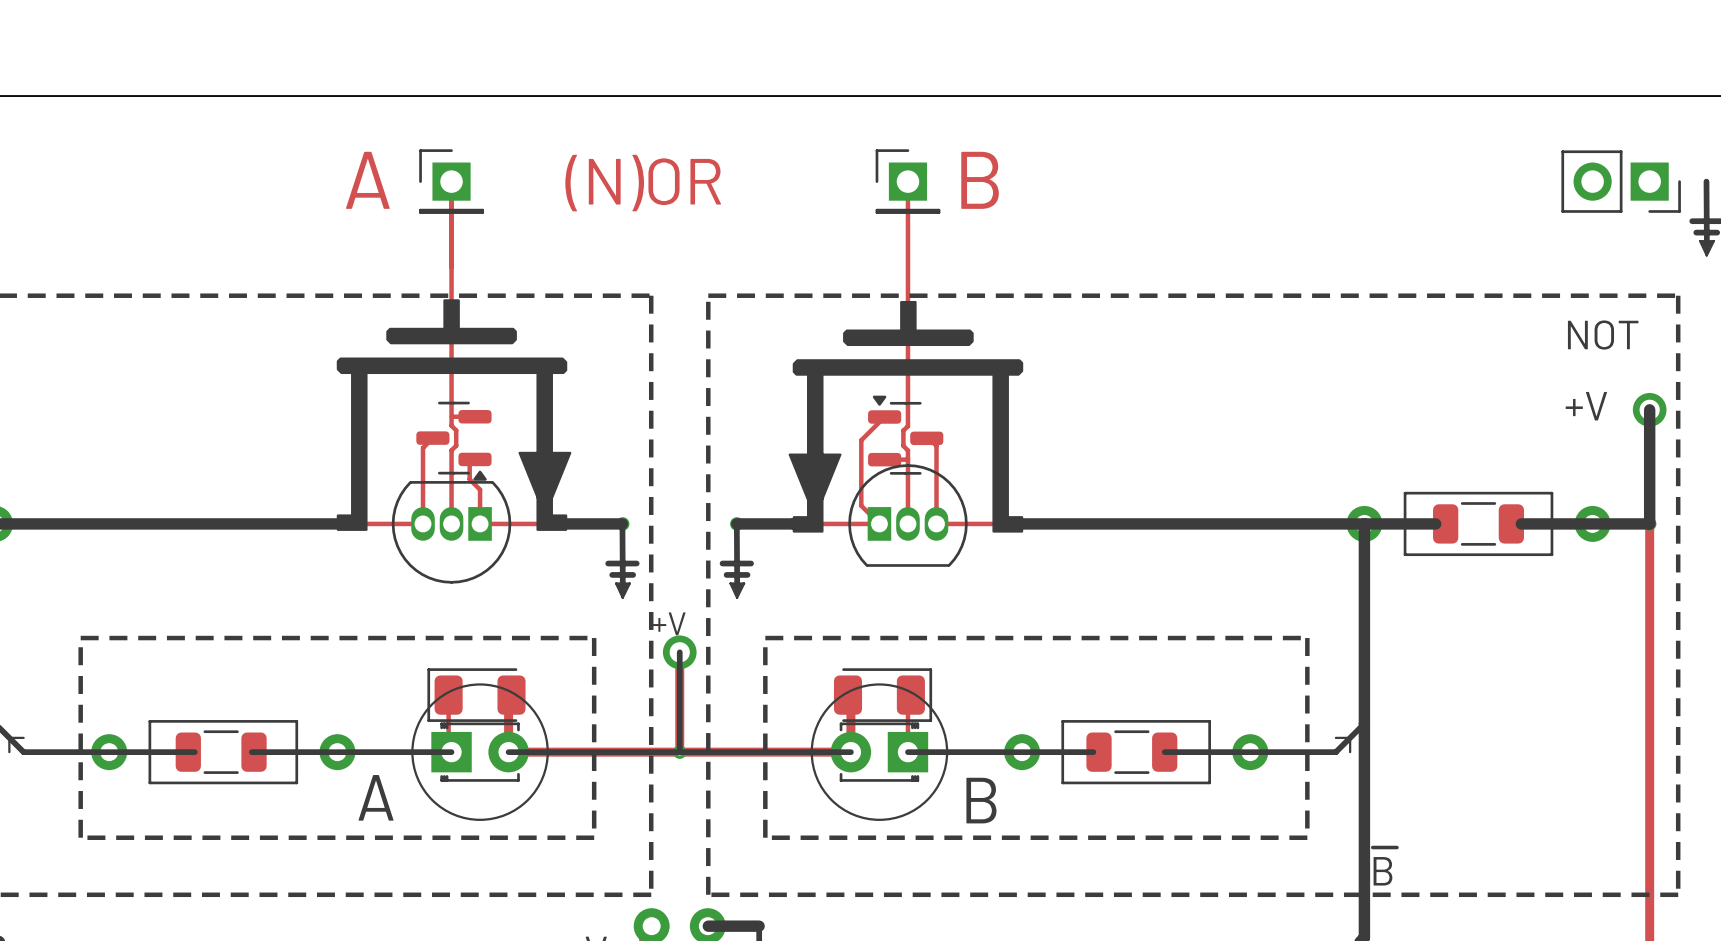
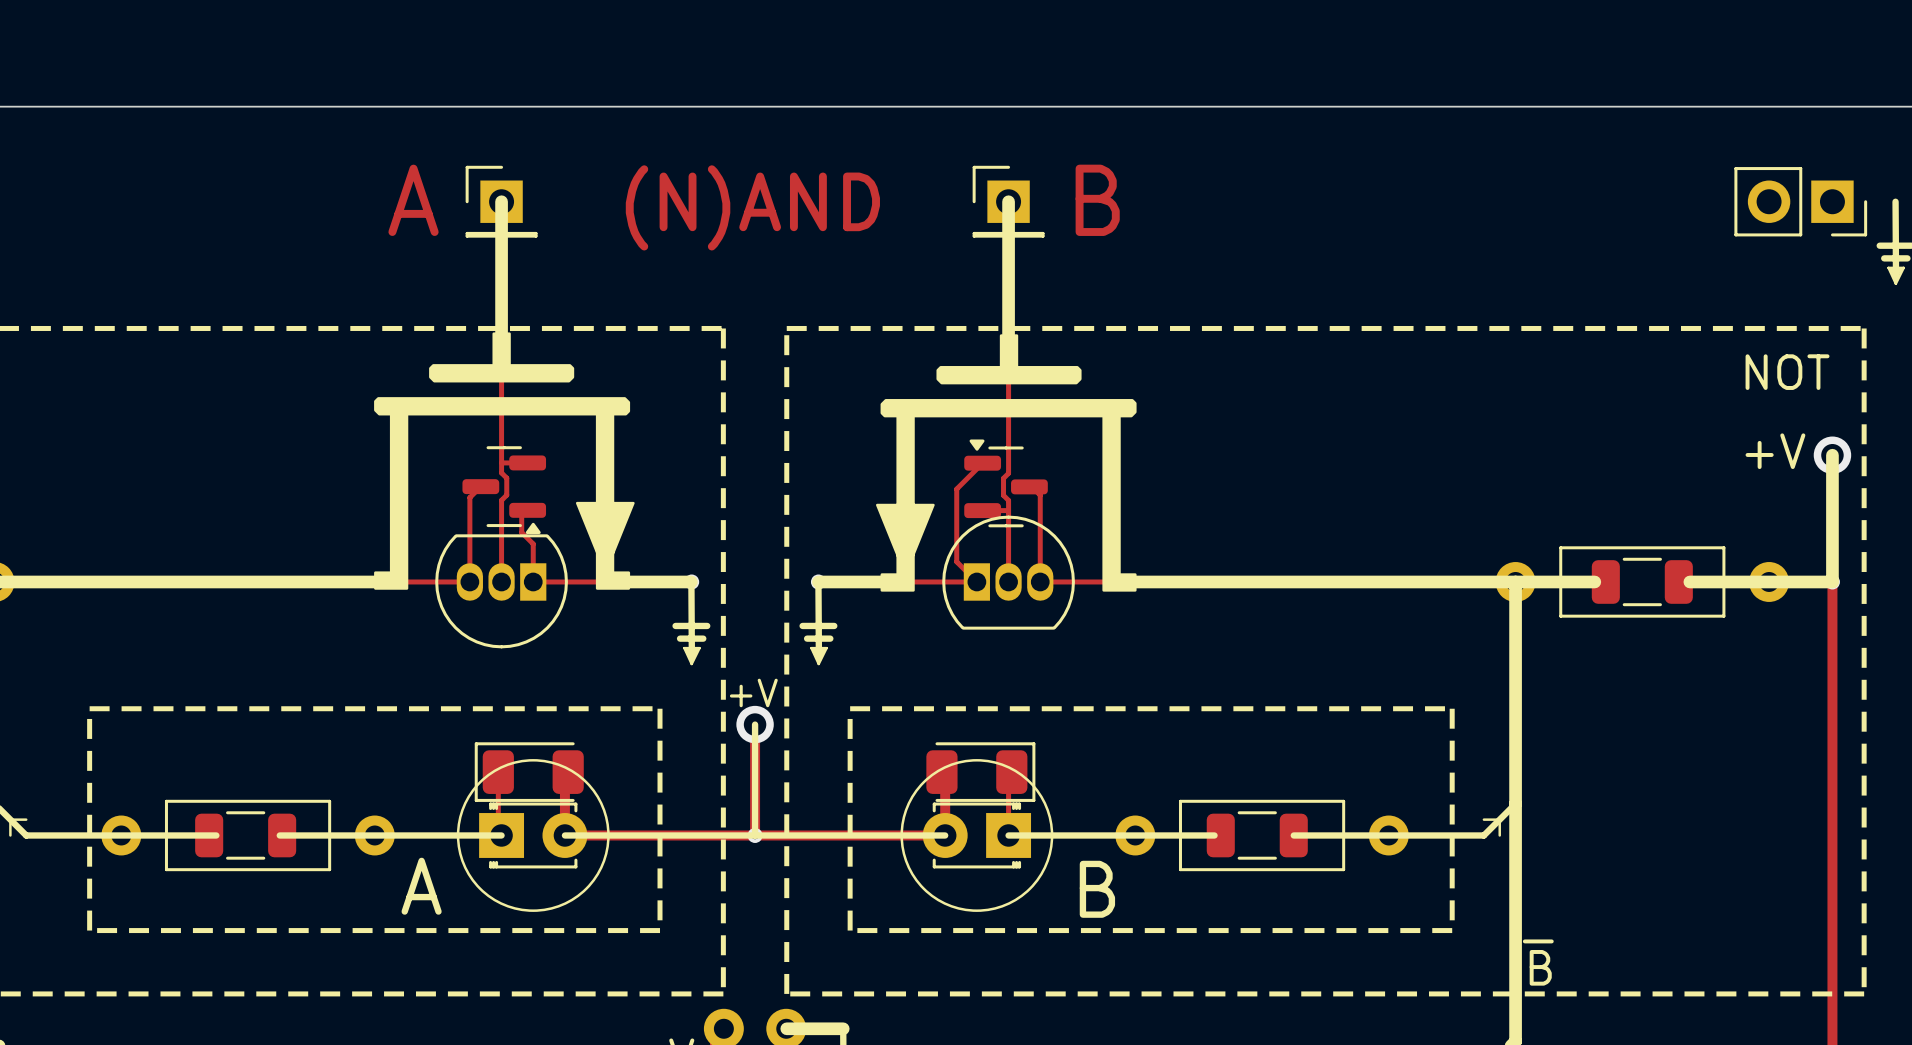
line: none -> (501, 201) (501, 344)
line: none -> (1008, 201) (1008, 344)
text: (N)OR (643, 183) -> (N)AND (752, 207)

